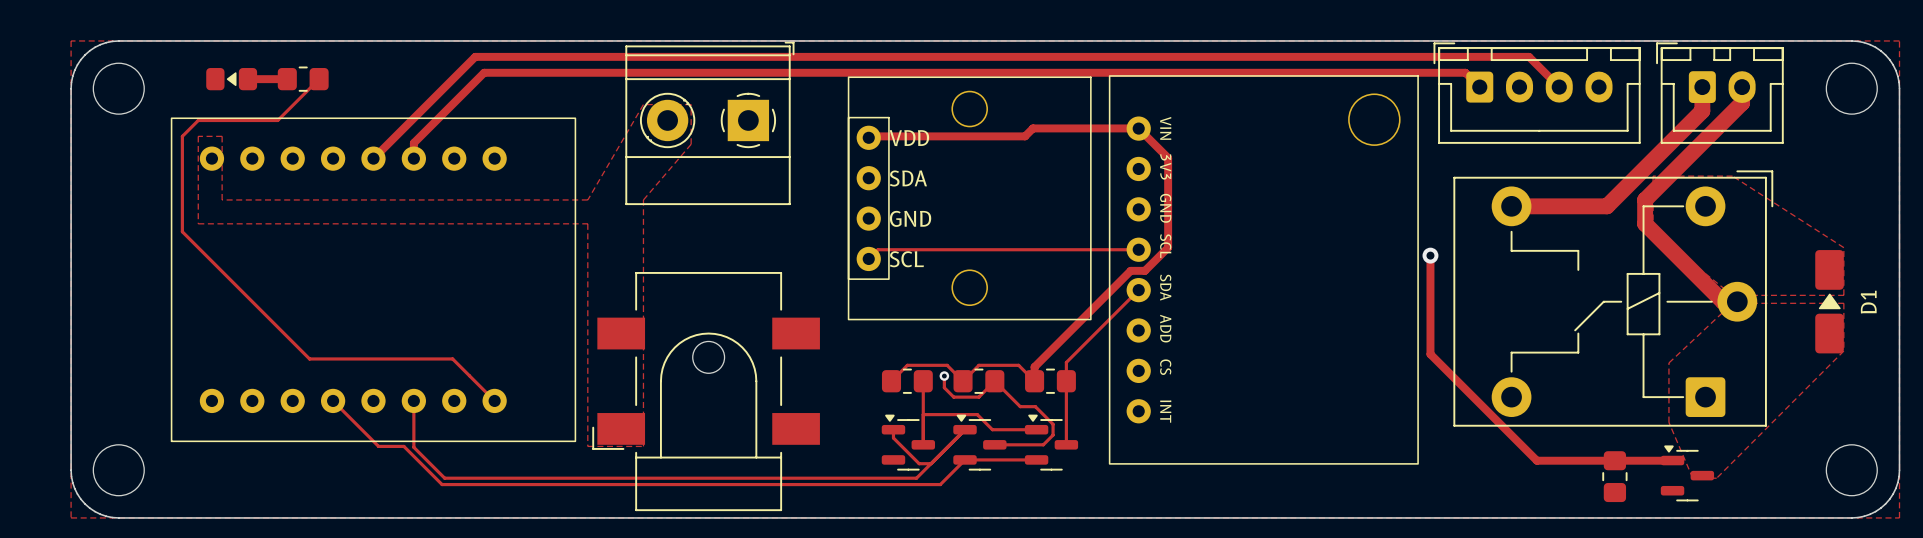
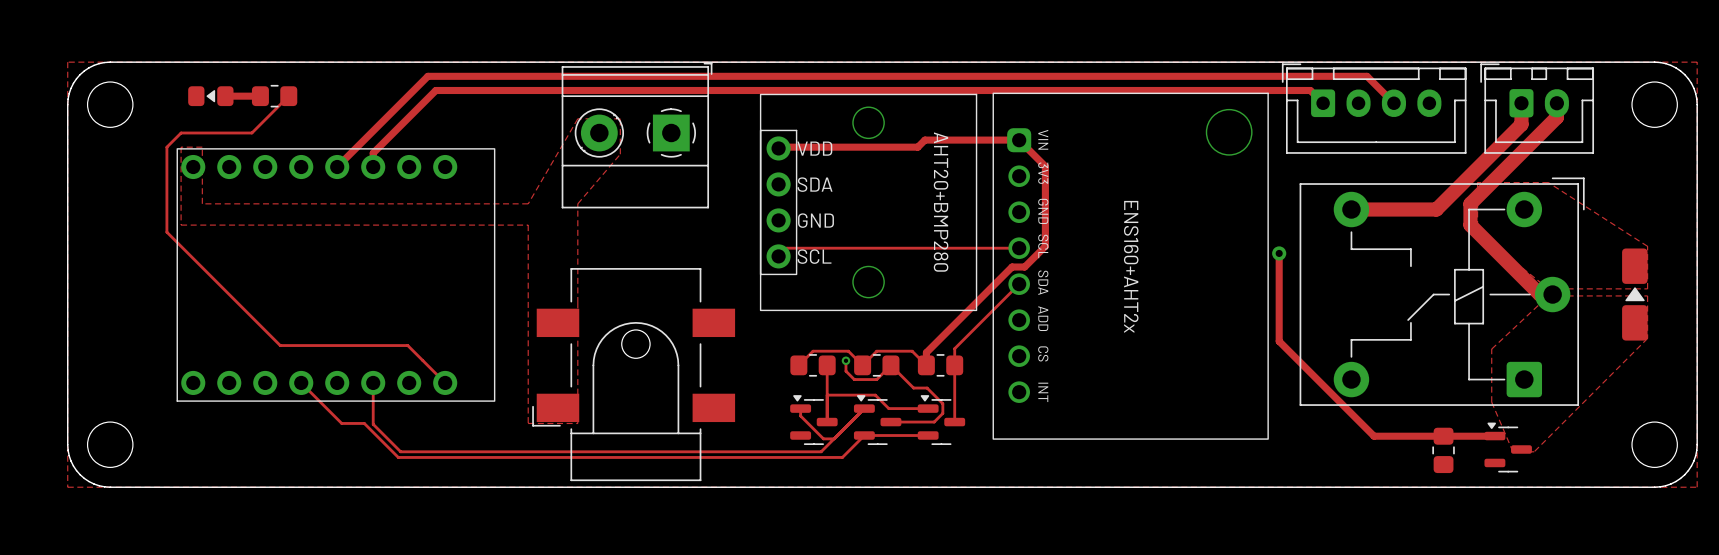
part footprint: [1108, 75, 1419, 465] -> [992, 92, 1269, 440]
part footprint: [847, 76, 1092, 321] -> [759, 93, 978, 312]
part footprint: [170, 117, 577, 443] -> [176, 148, 496, 402]
D1 name: D1 (1868, 302) -> none

